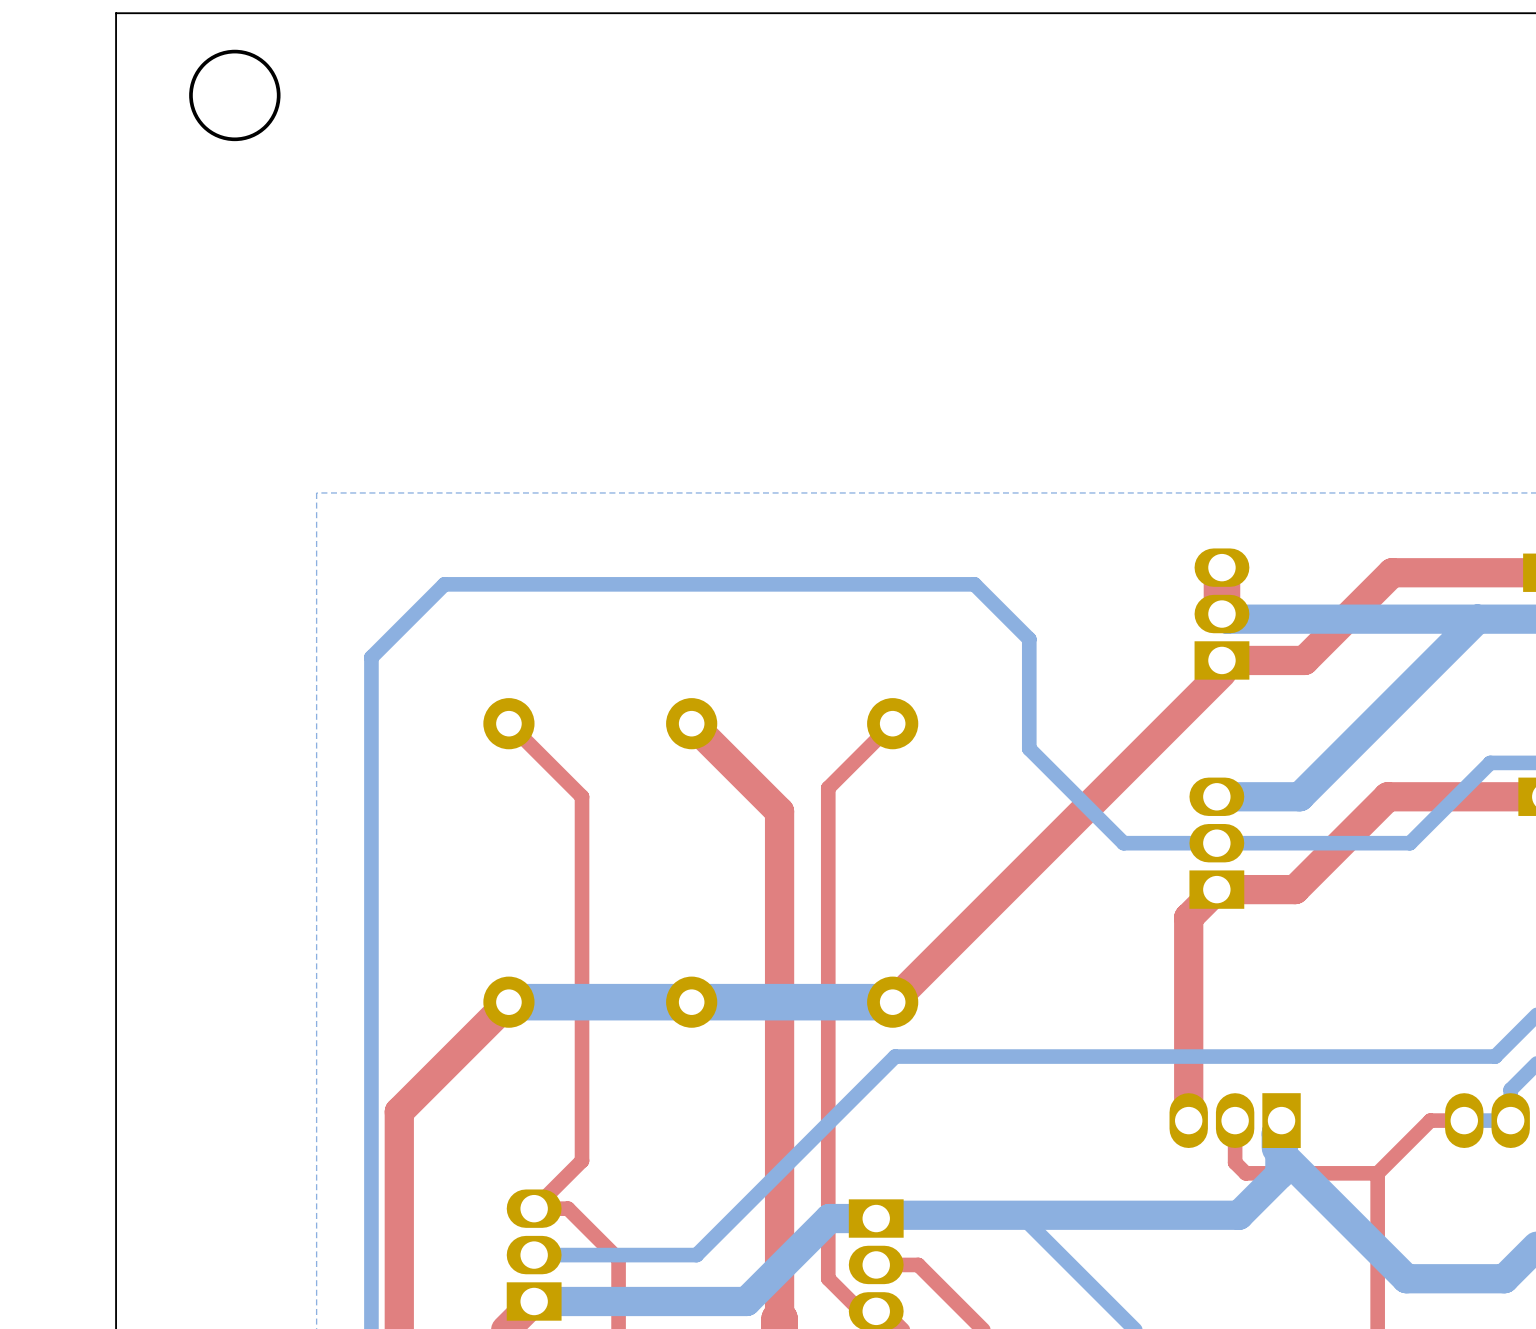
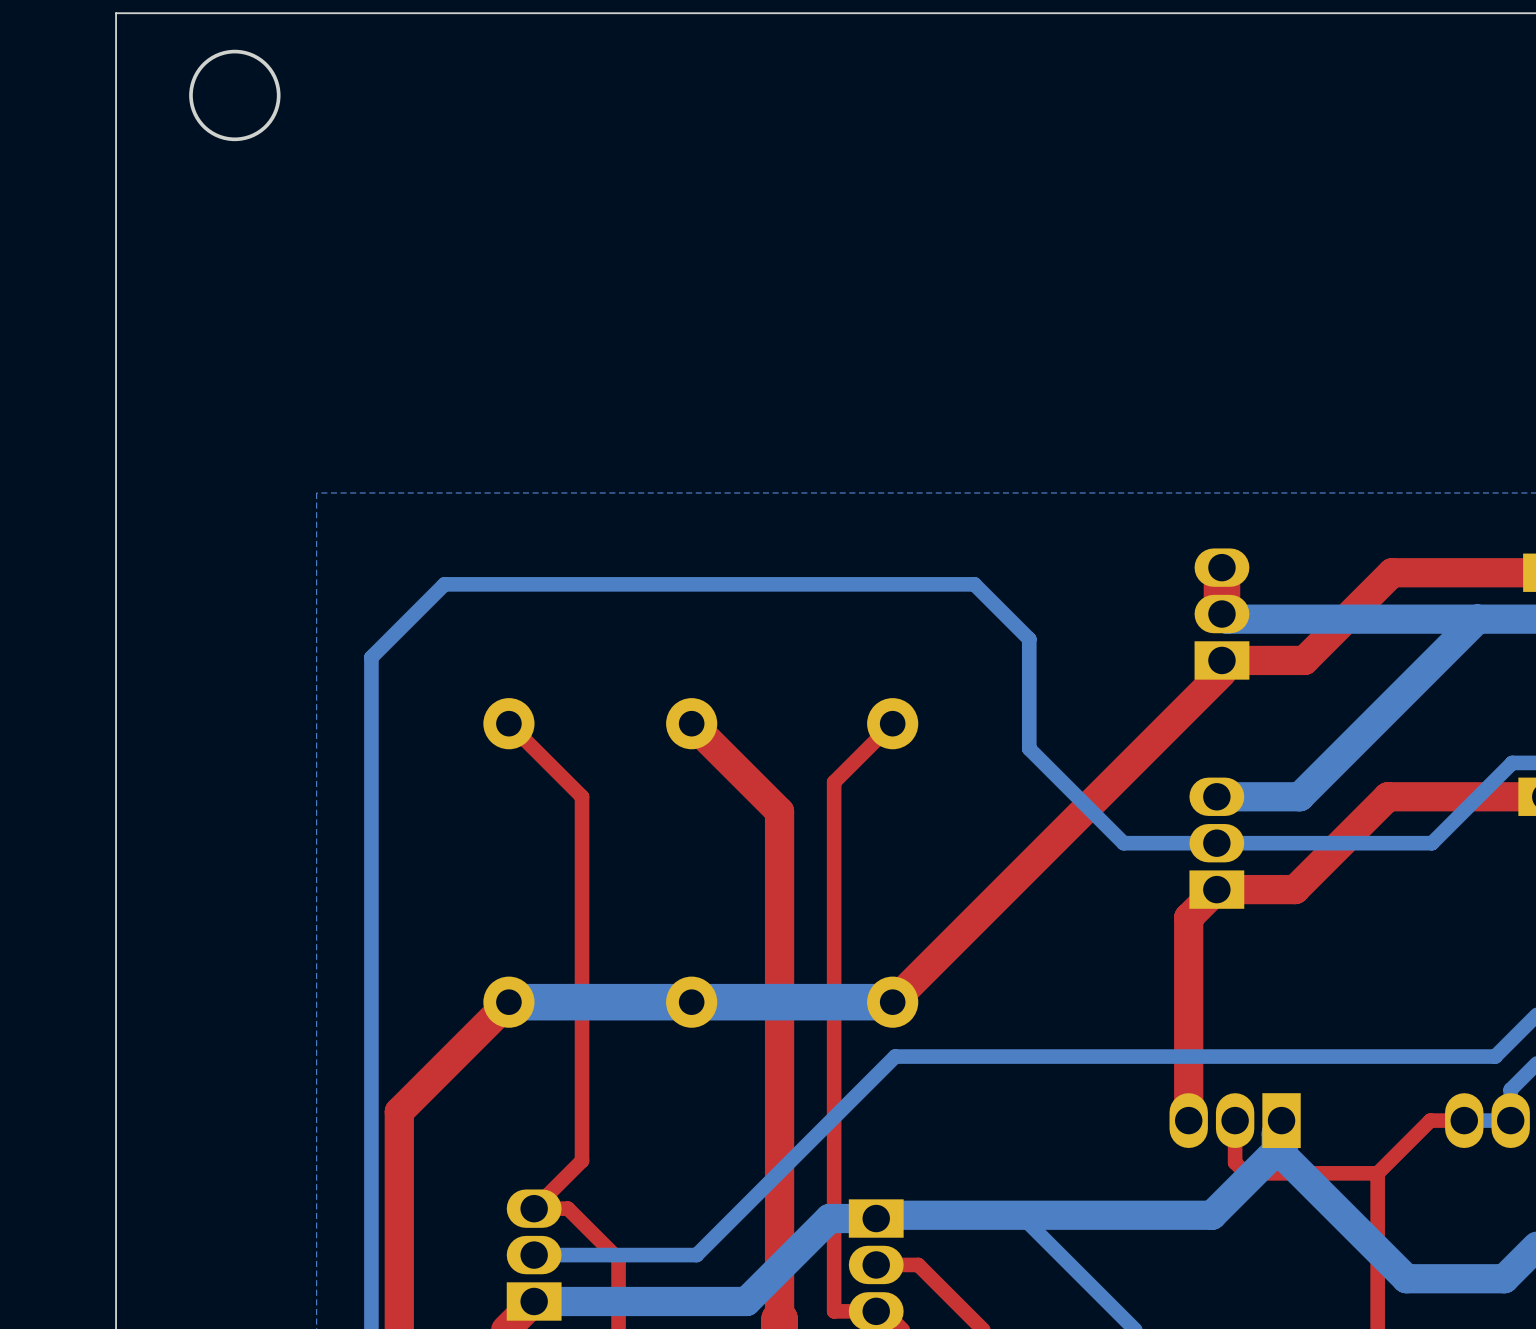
bottom track: (1512, 762) (1490, 762) (1410, 843) -> (1512, 762) (1432, 843) (1410, 843)
top track: (834, 782) (828, 788) (828, 1278) (860, 1311) -> (834, 782) (834, 1311) (860, 1311)
bottom track: (1279, 1147) (1279, 1174) (1238, 1215) (1212, 1215) -> (1279, 1147) (1212, 1215)

